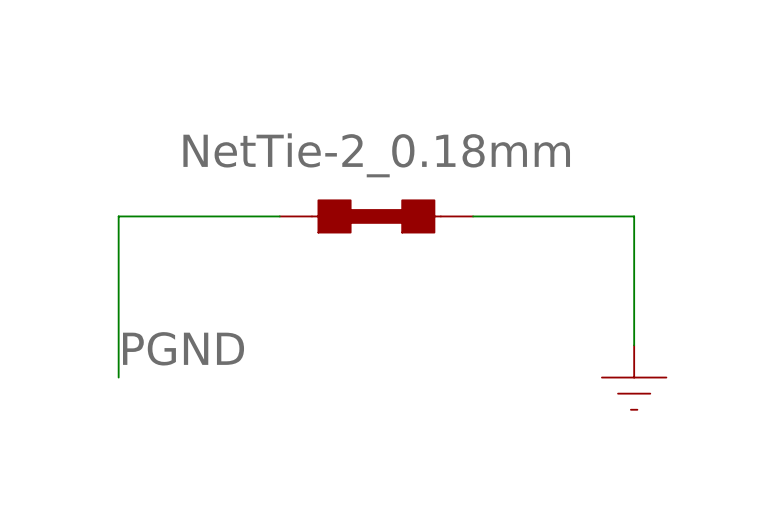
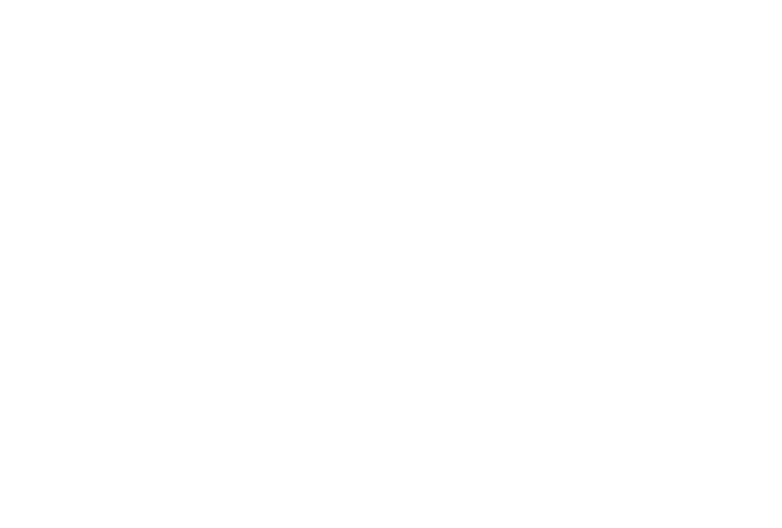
wire: (279, 216) (118, 216) (118, 377) -> none
part: NetTie-2_0.18mm (376, 216) -> none
wire: (473, 216) (634, 216) (634, 345) -> none
label: PGND (183, 348) -> none
power symbol: (634, 377) -> none

